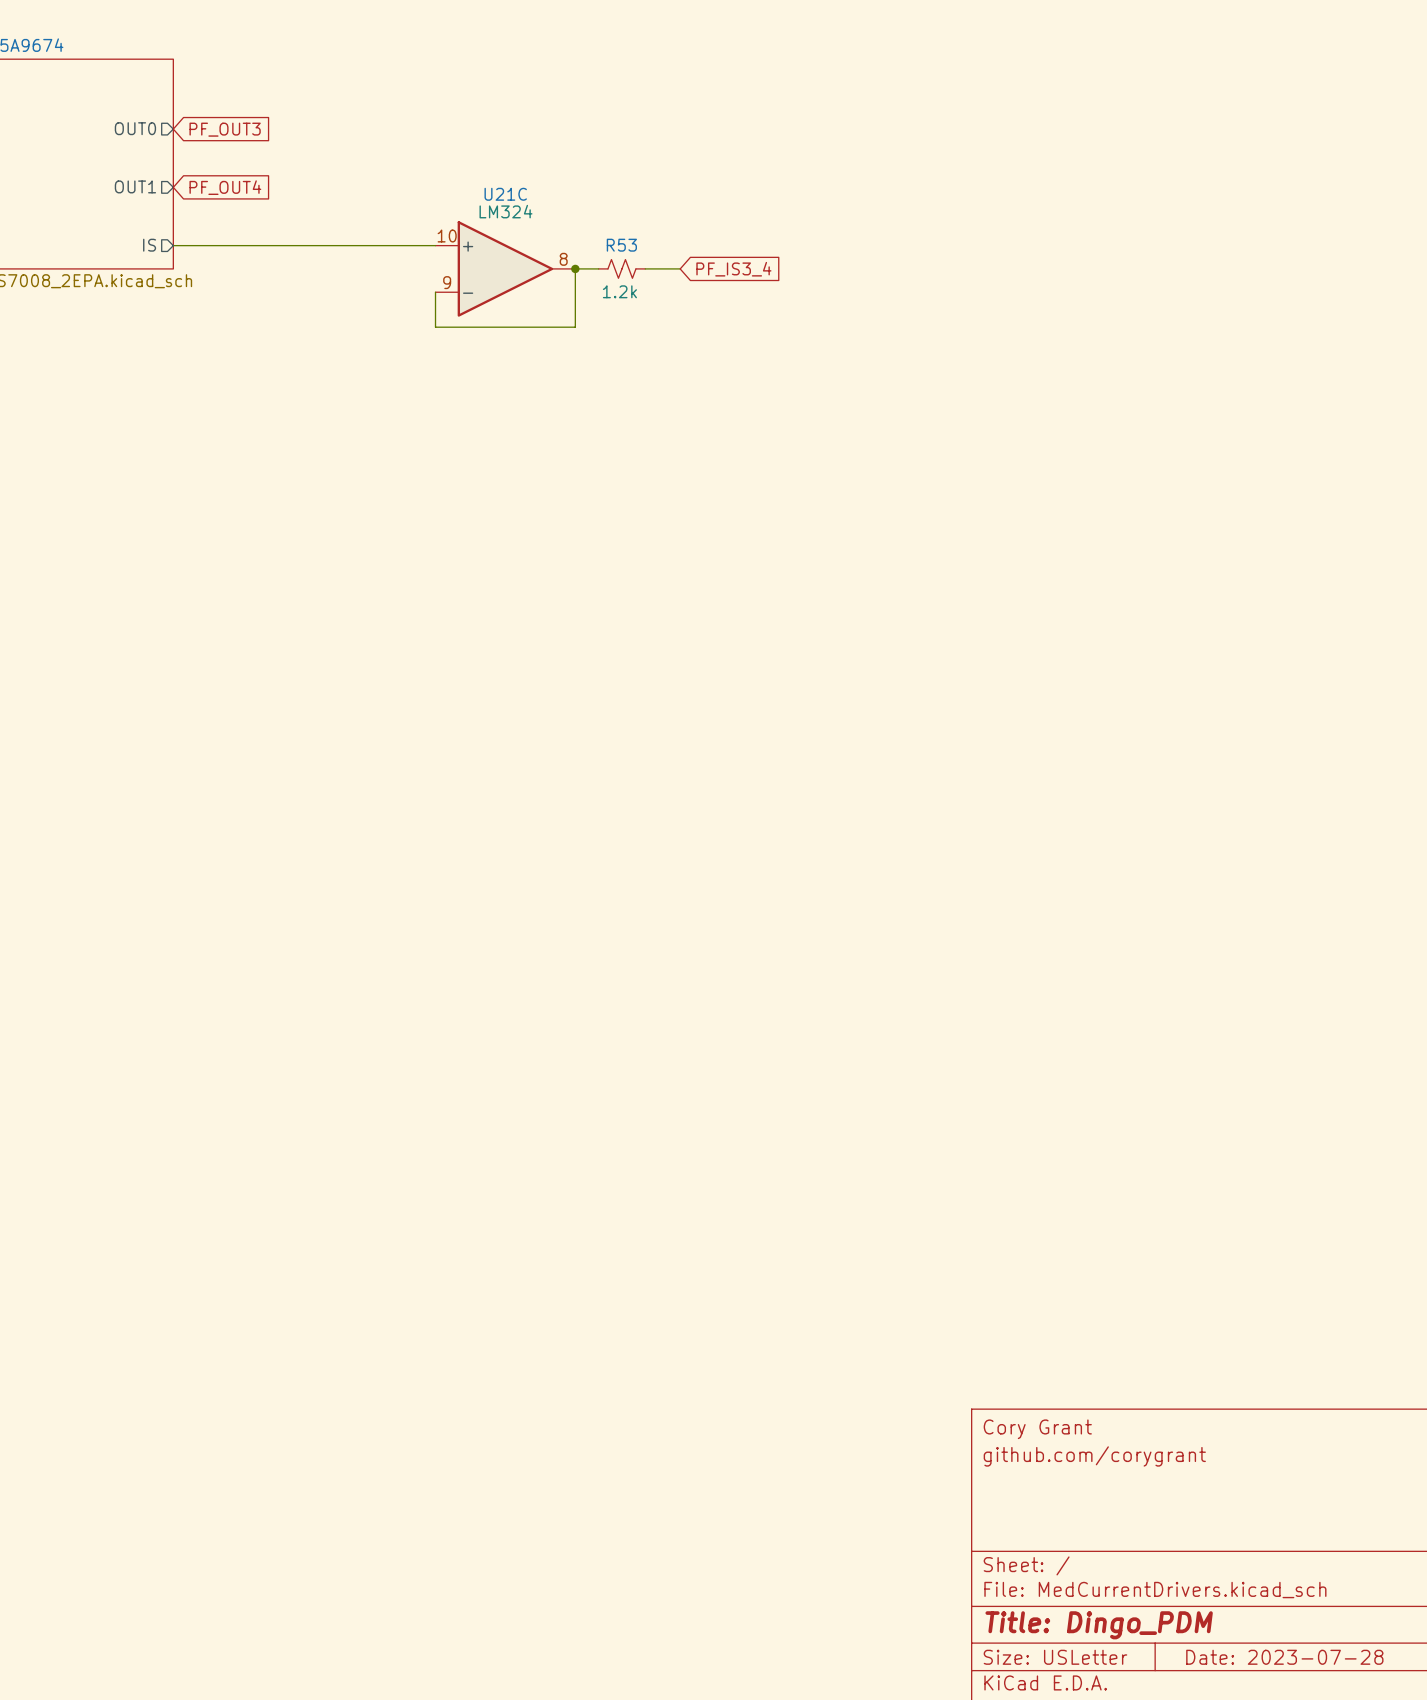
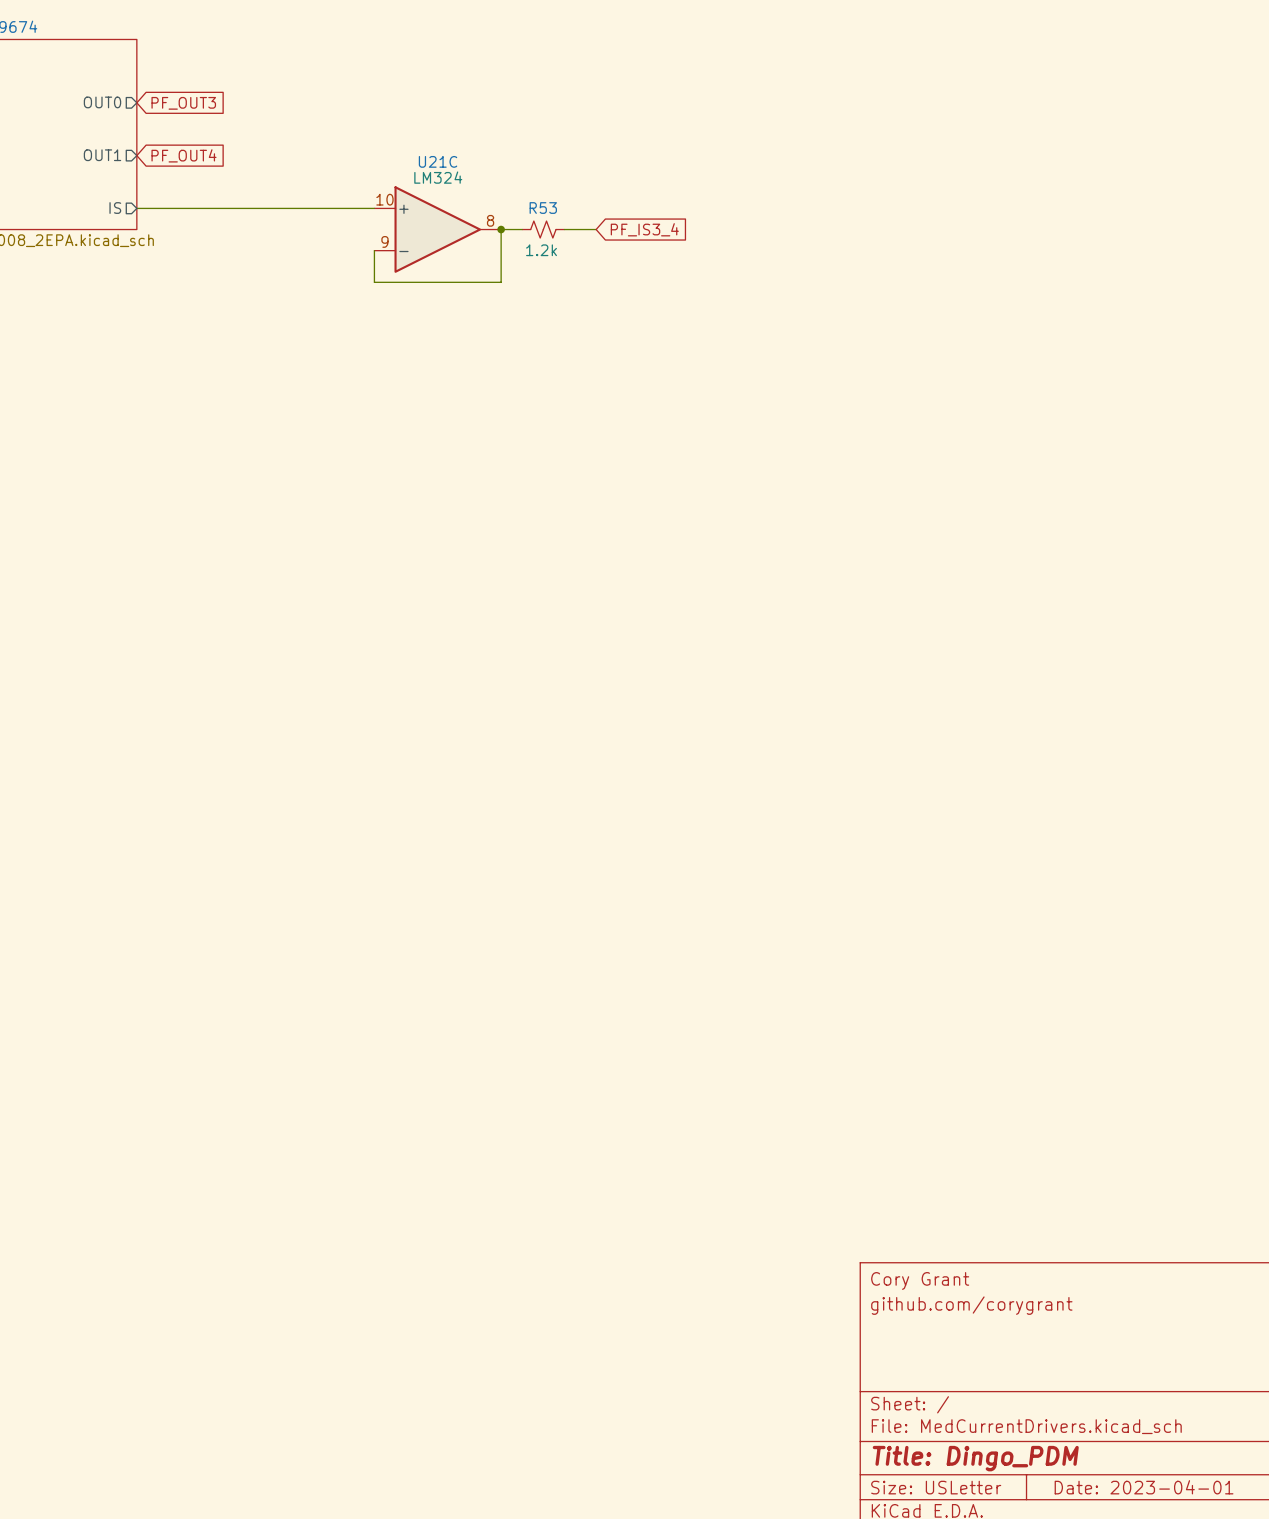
title block: Date: 2023-07-28 (1284, 1657) -> Date: 2023-04-01 (1144, 1487)

